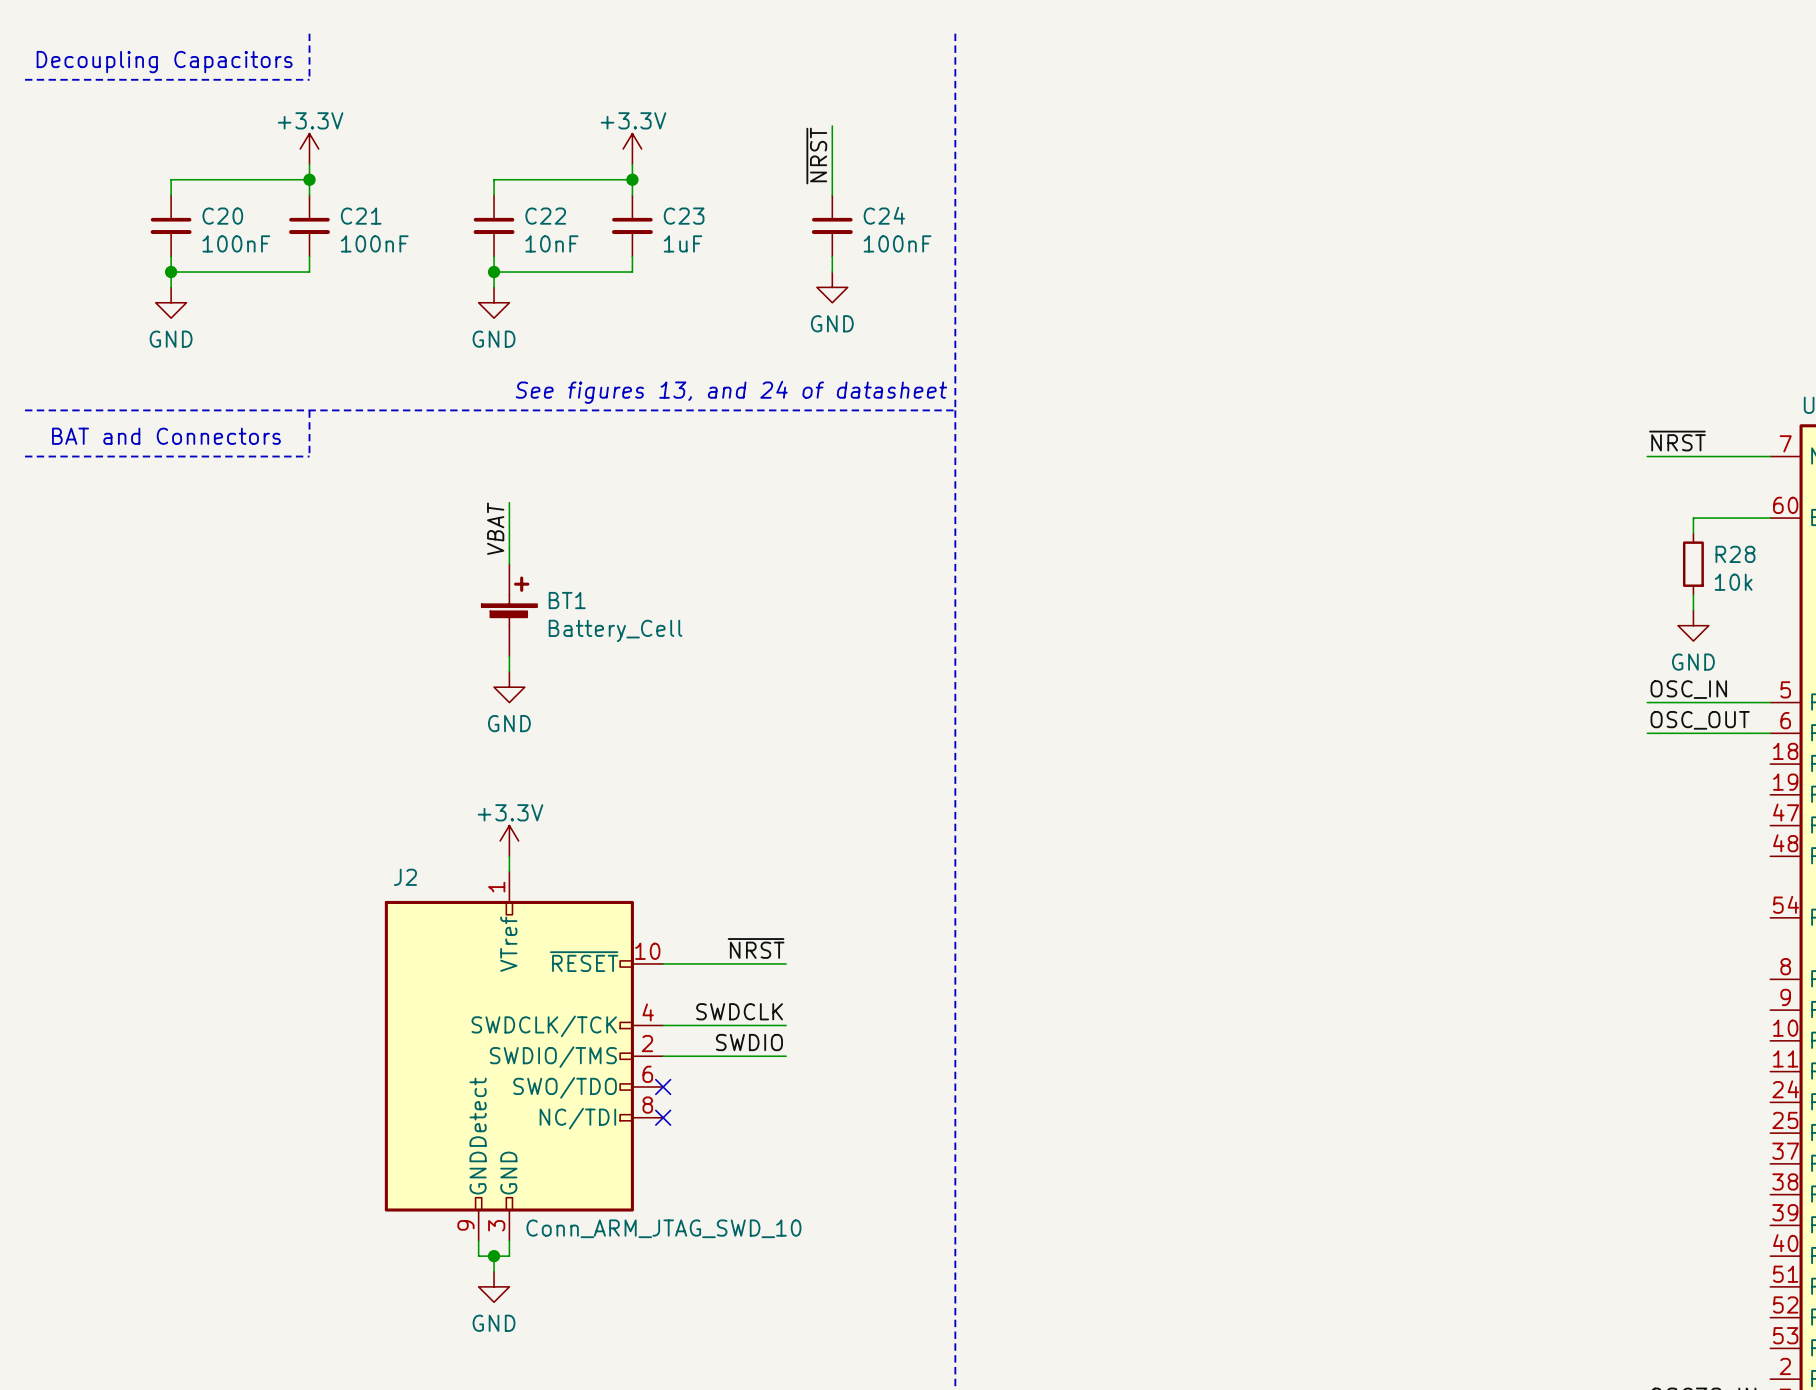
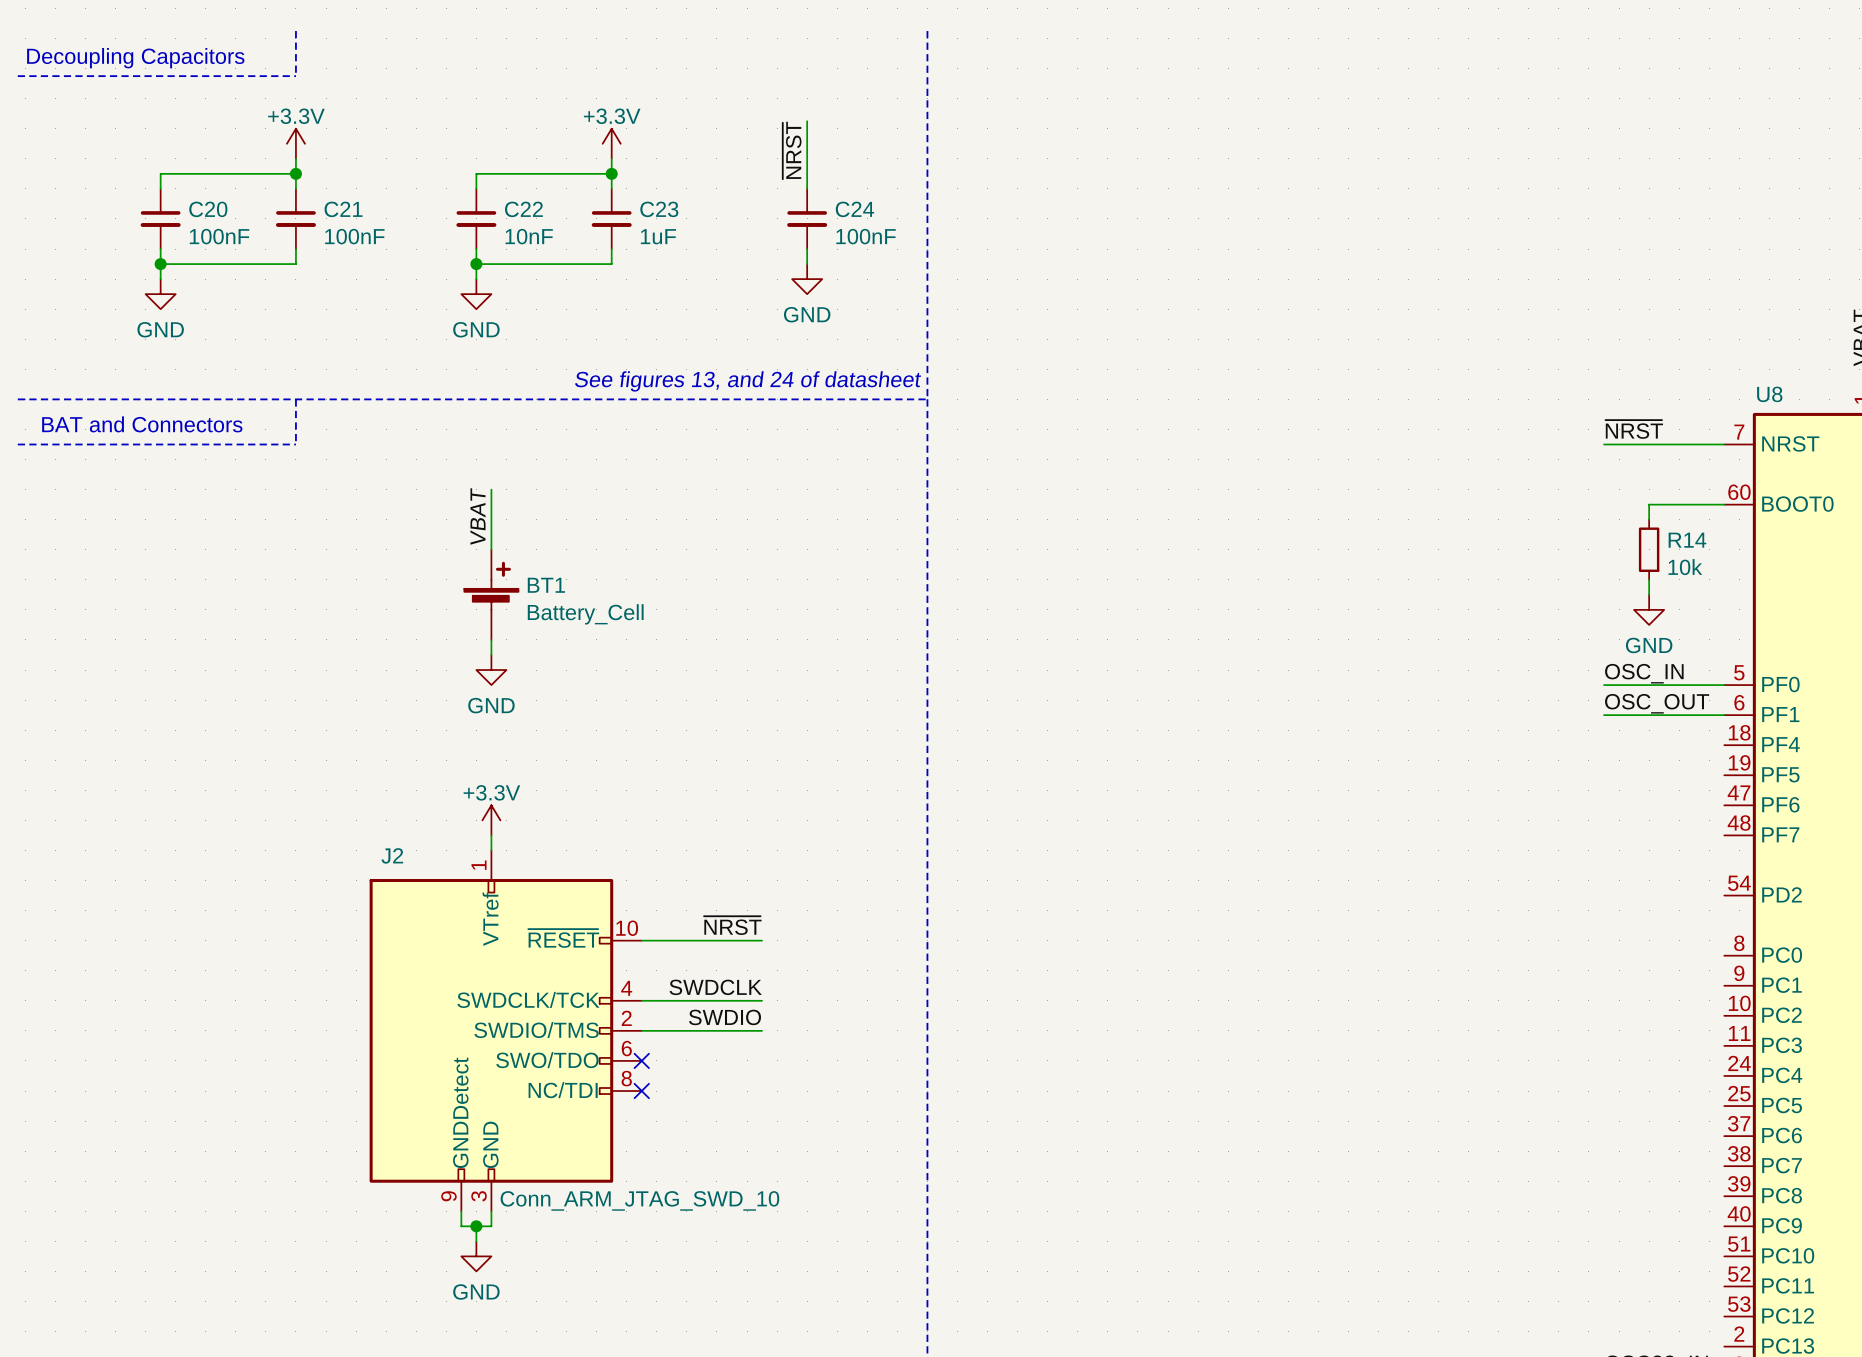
R28 name: R28 (1735, 554) -> R14 (1687, 540)

